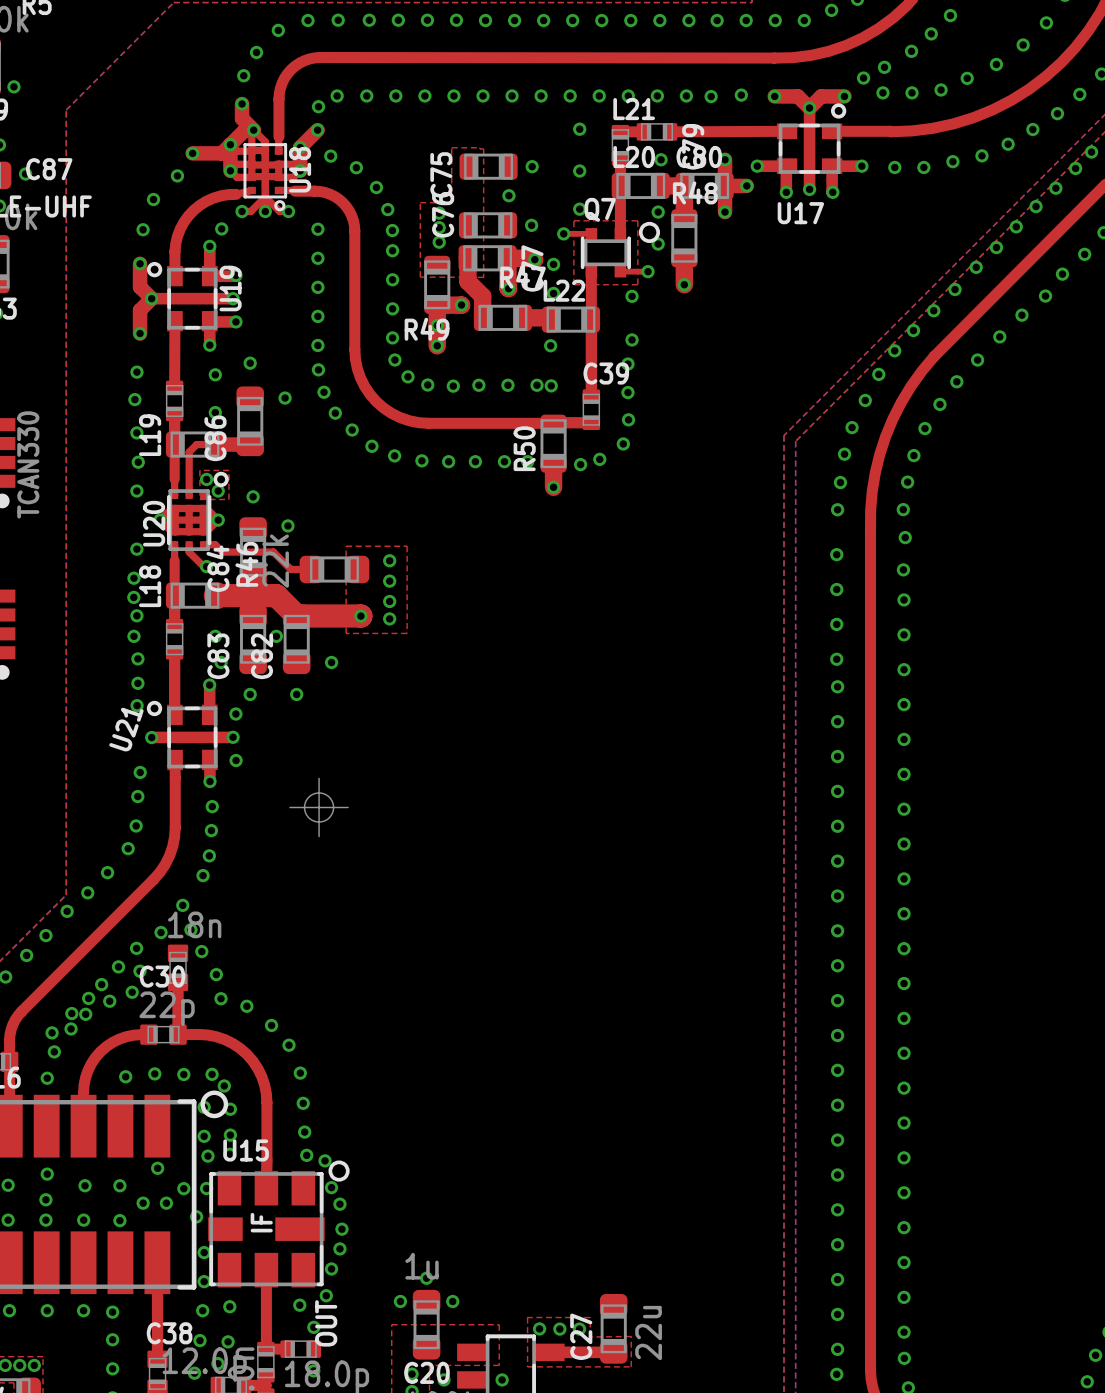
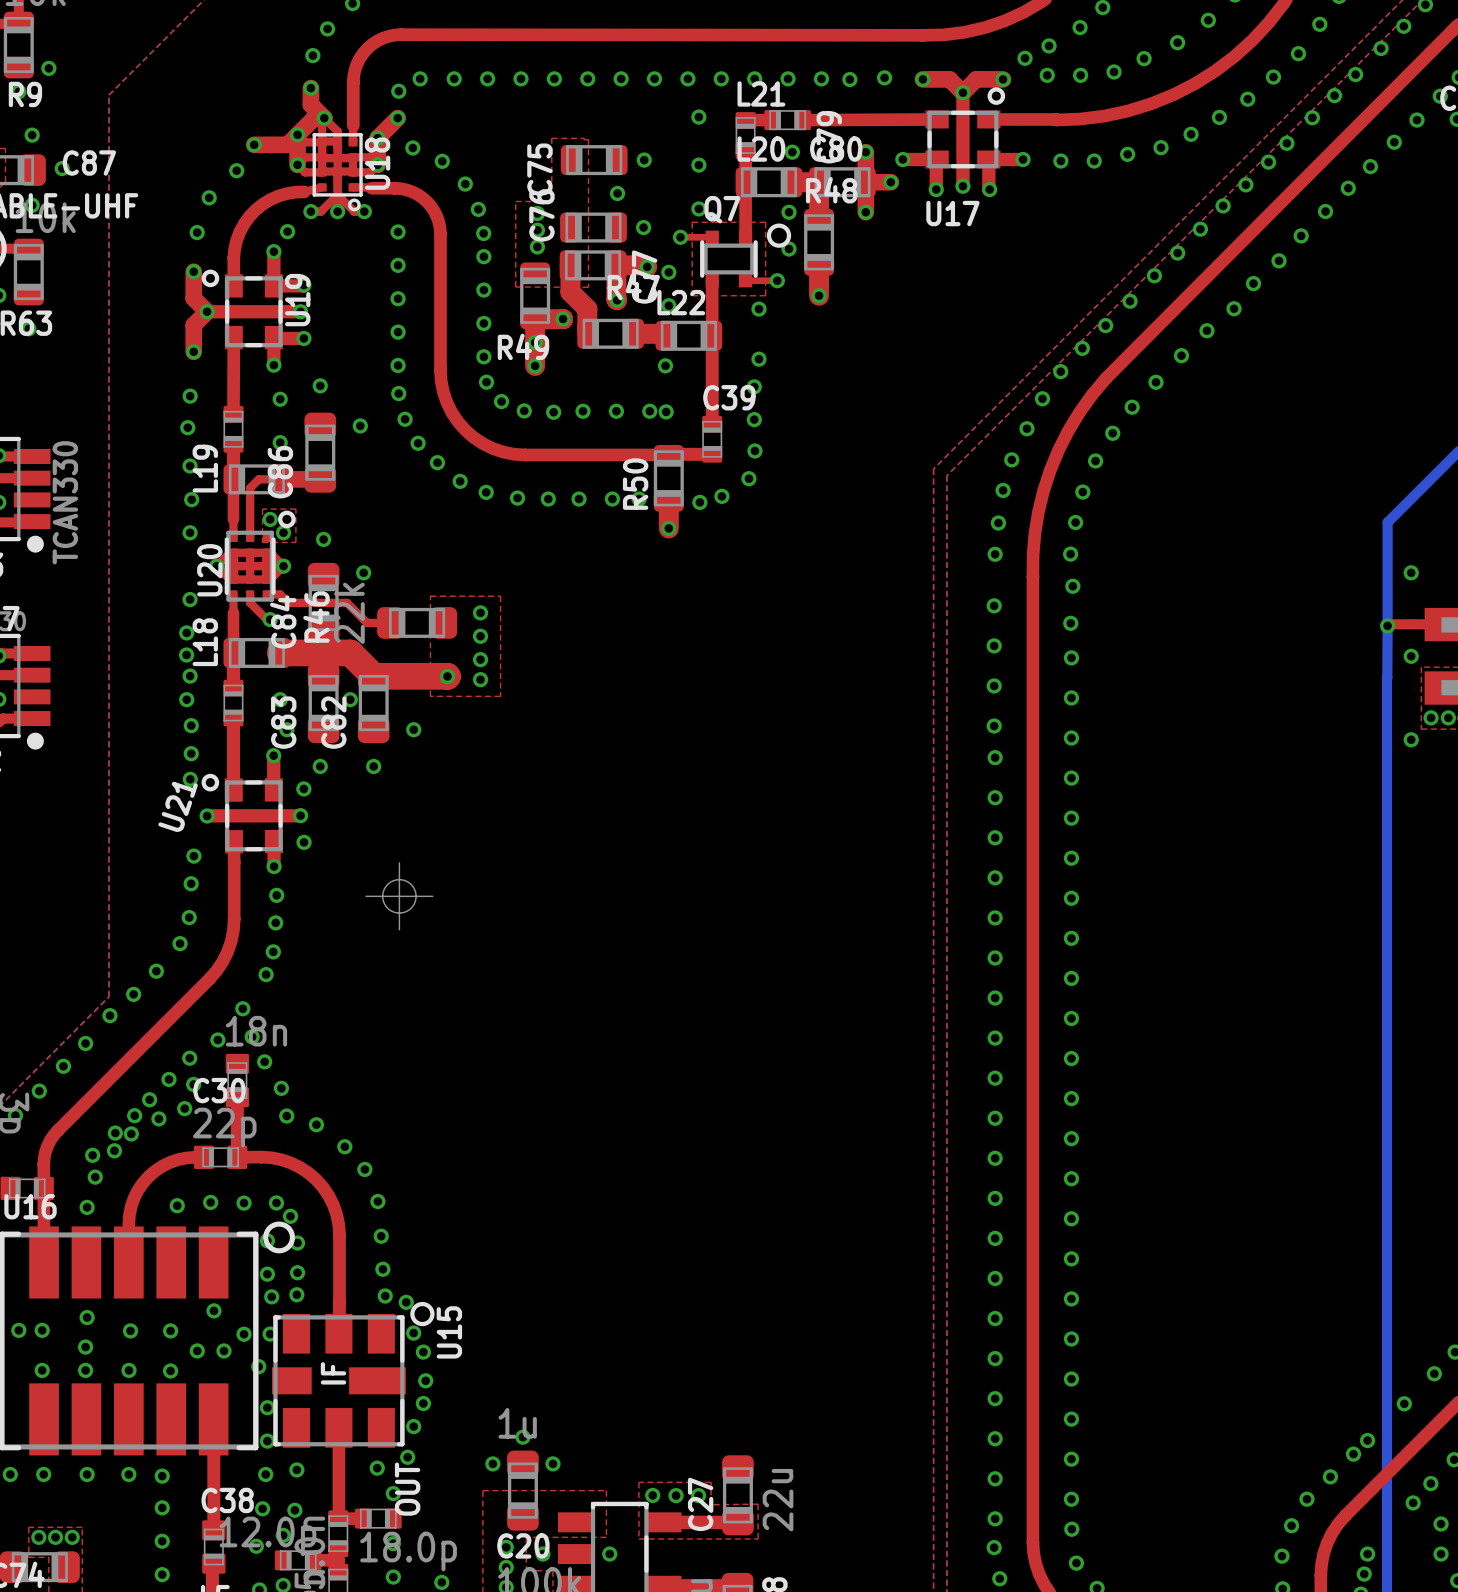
U15 name rotation: 0° (246, 1150) -> 90° counterclockwise (449, 1332)
U15 name position: U15 (246, 1150) -> U15 (449, 1332)

